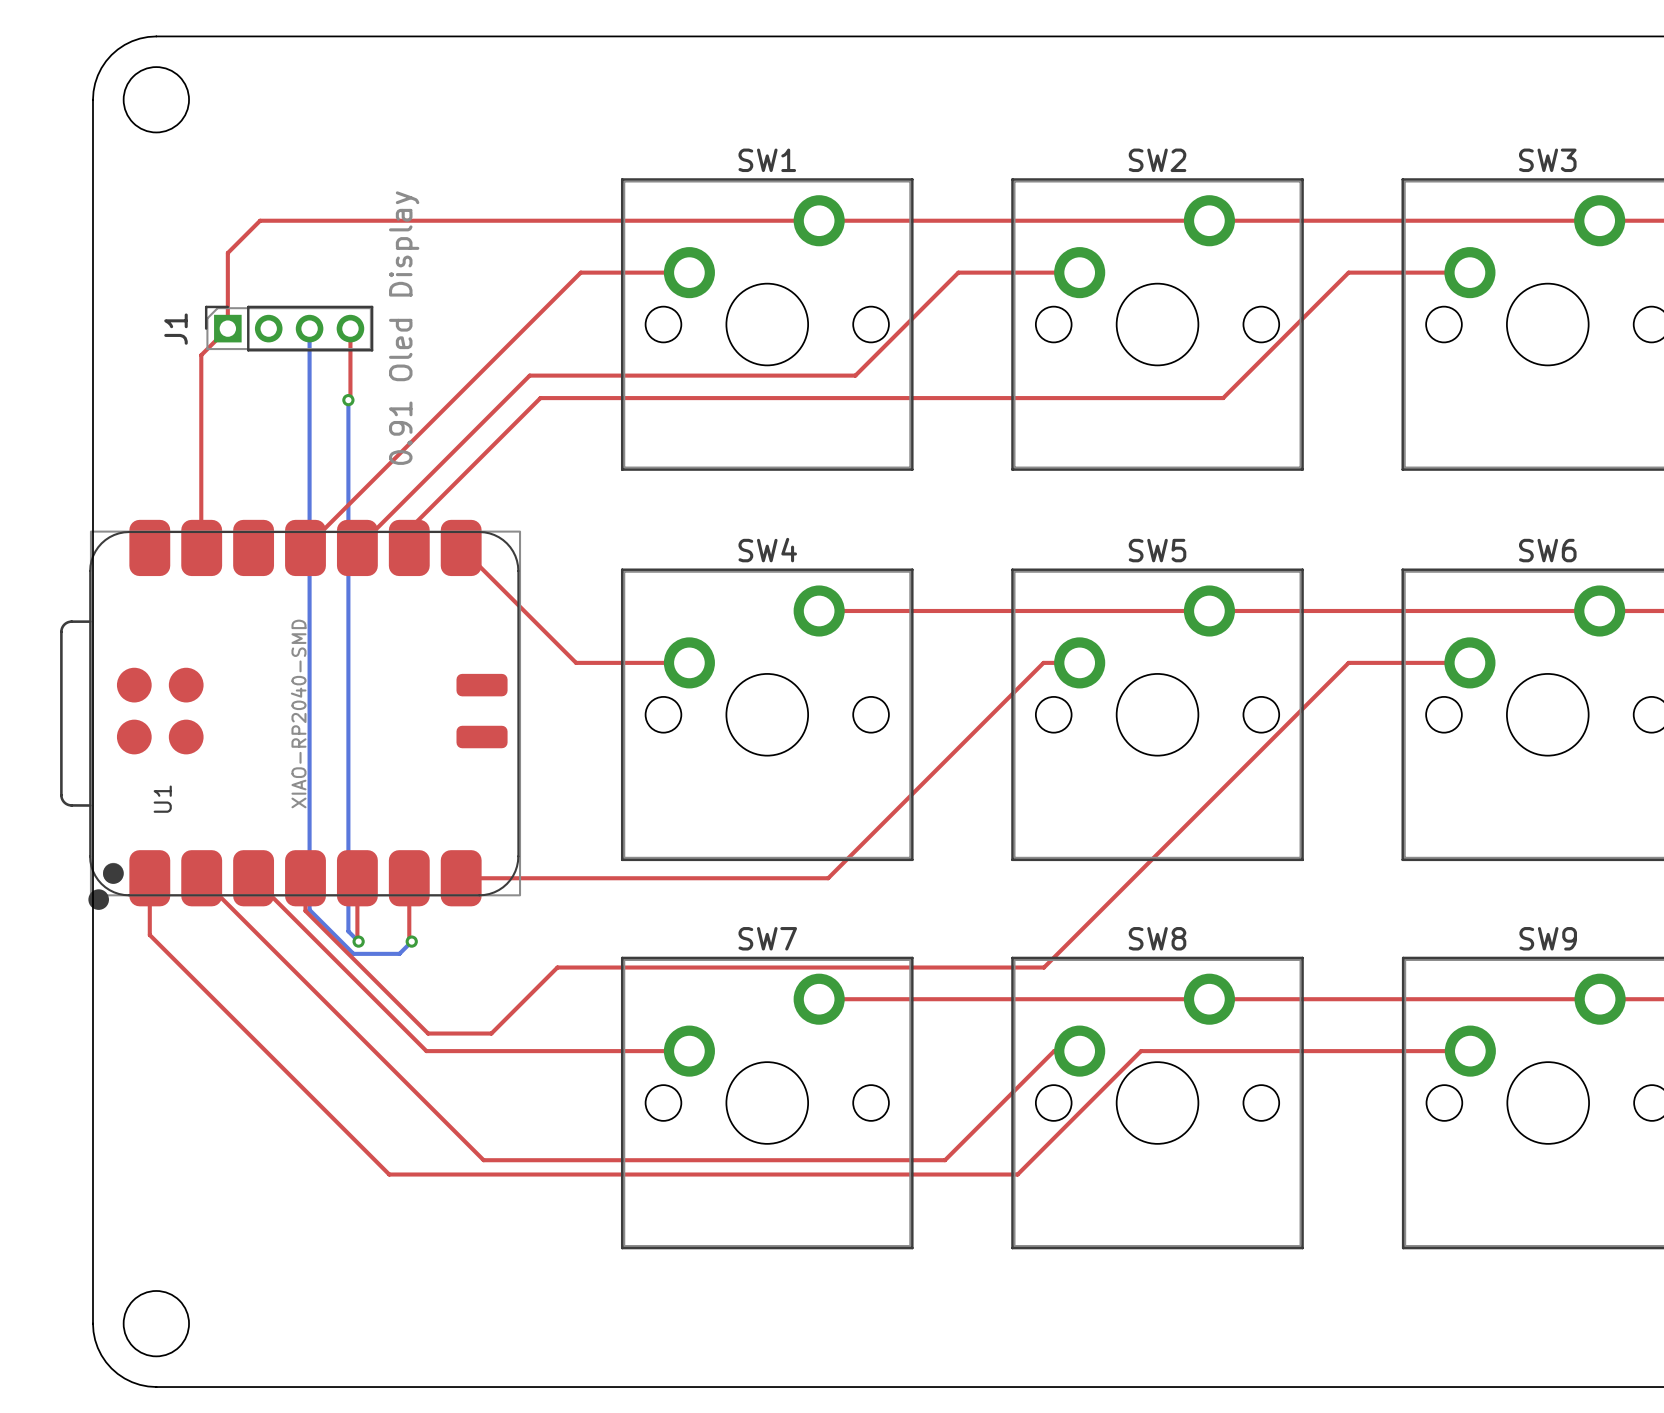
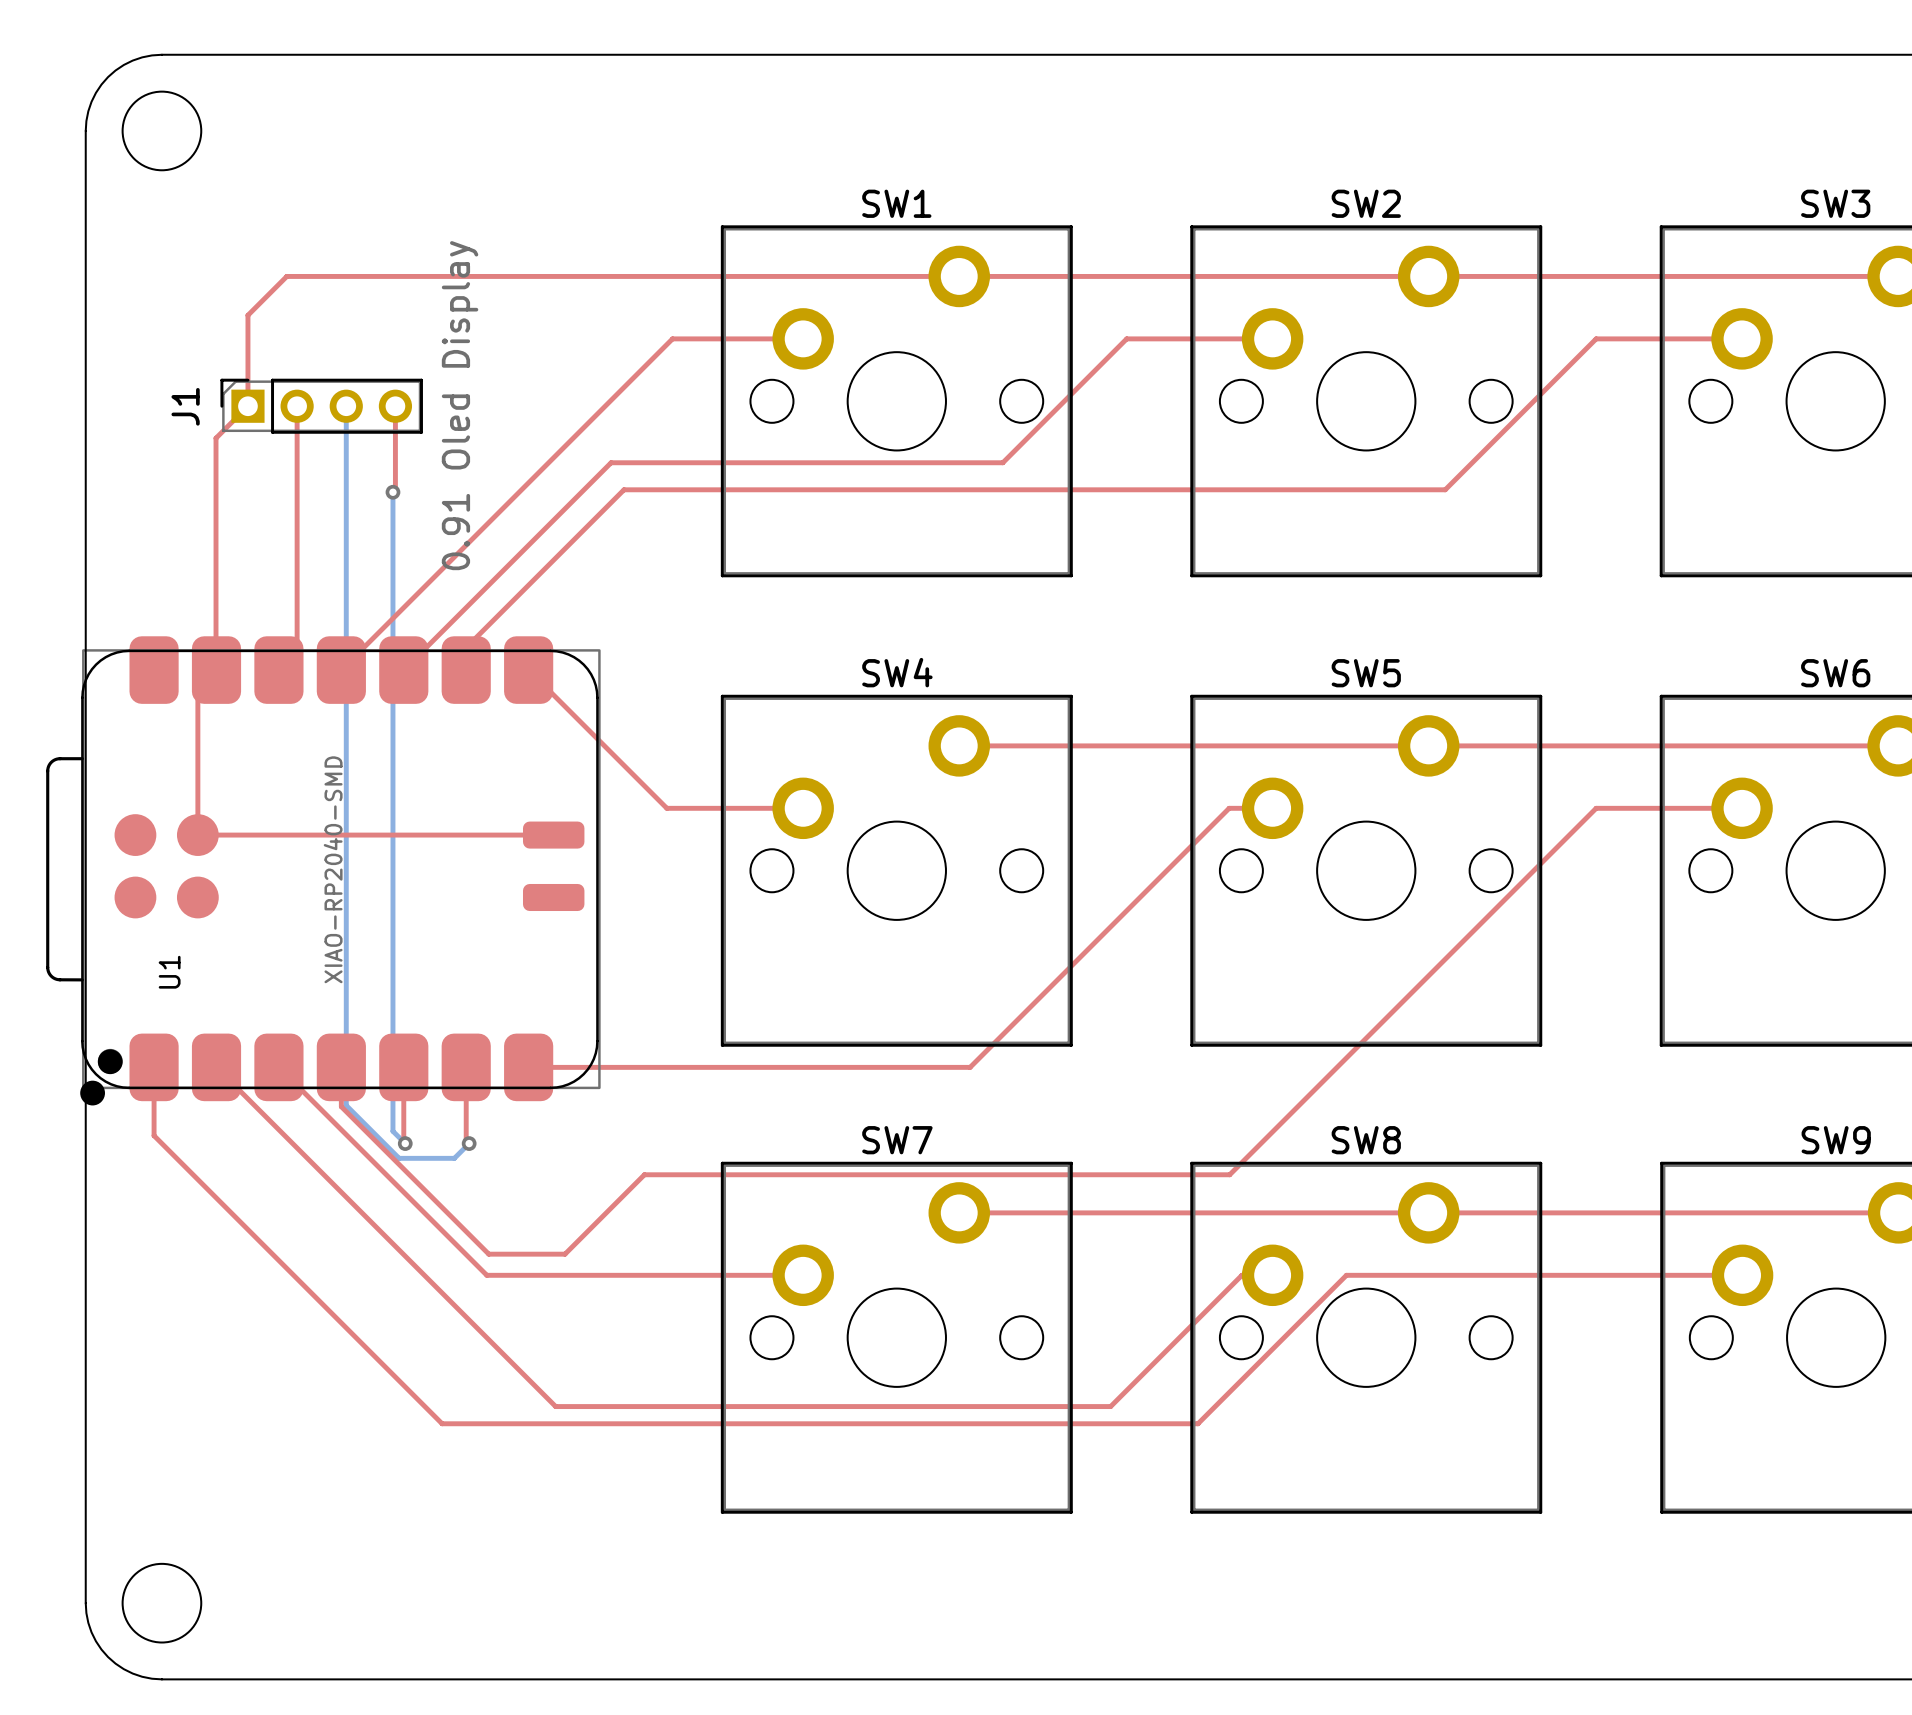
top track: none -> (297, 406) (297, 651) (278, 670)
top track: none -> (216, 670) (197, 688) (197, 835) (553, 835)

